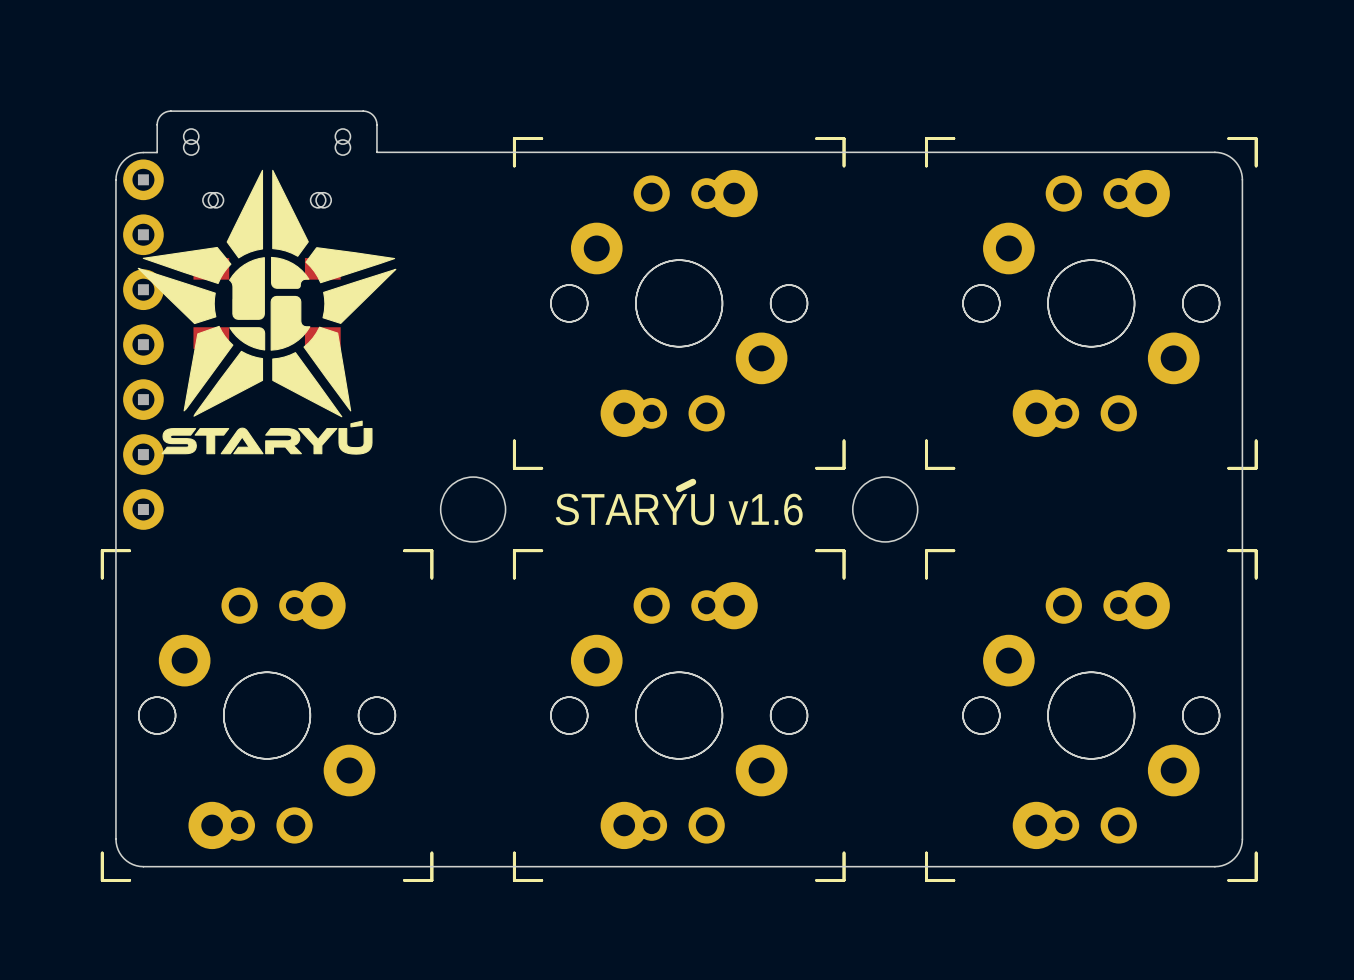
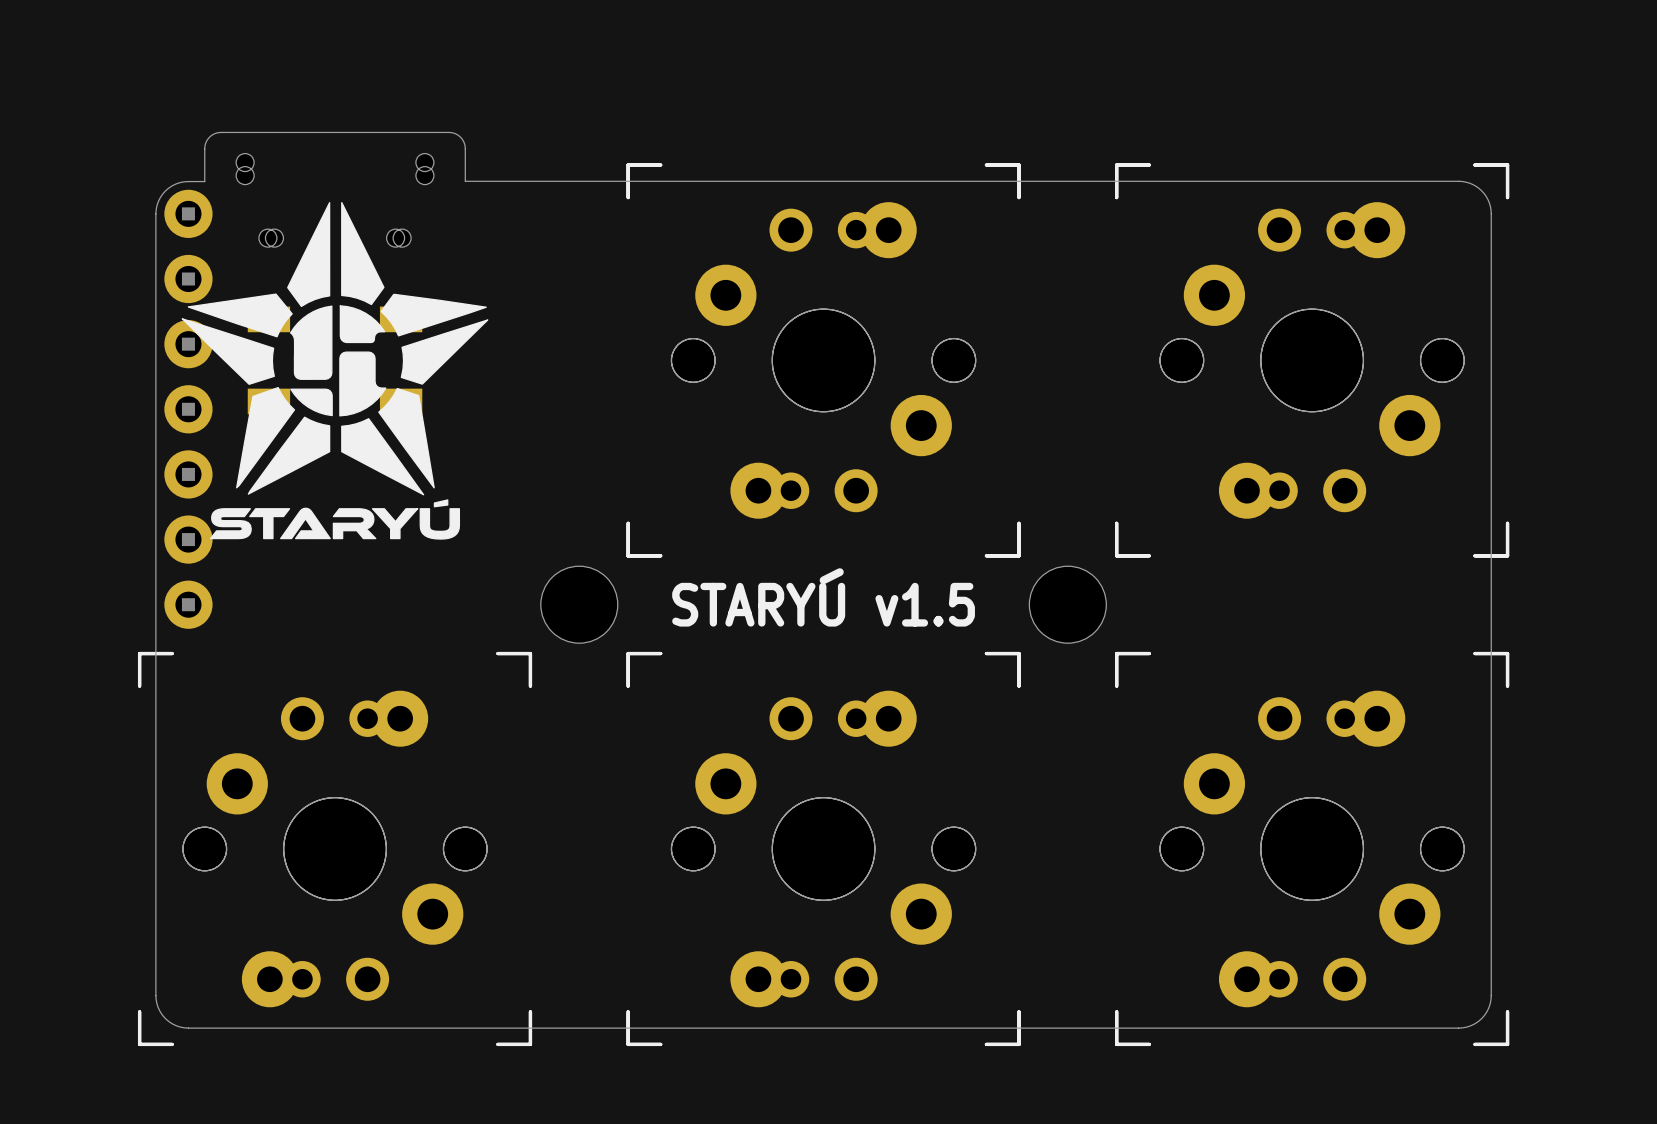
text: STARYU v1.6 (679, 509) -> STARYU v1.5 (823, 604)

